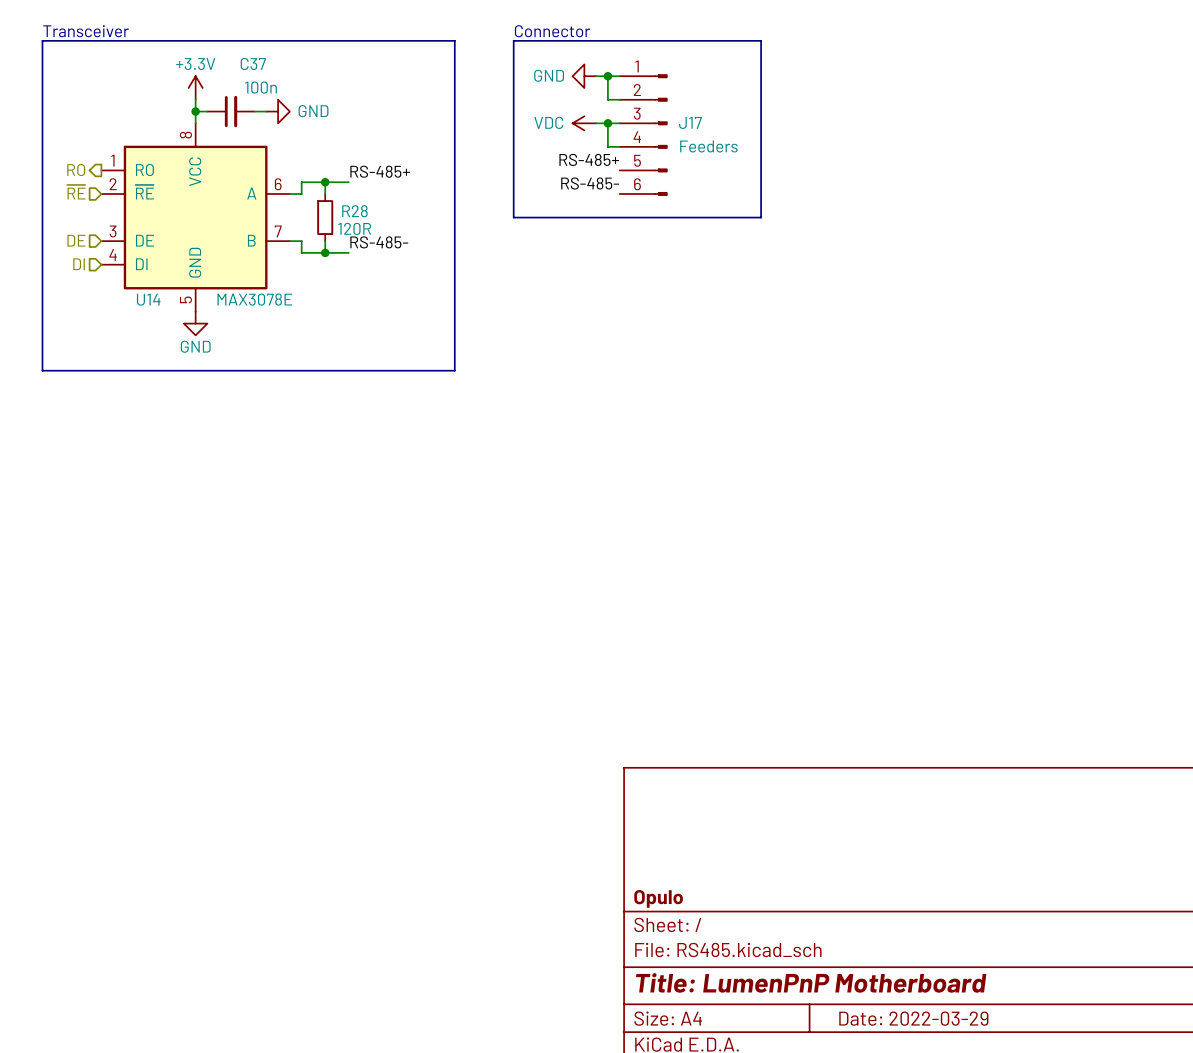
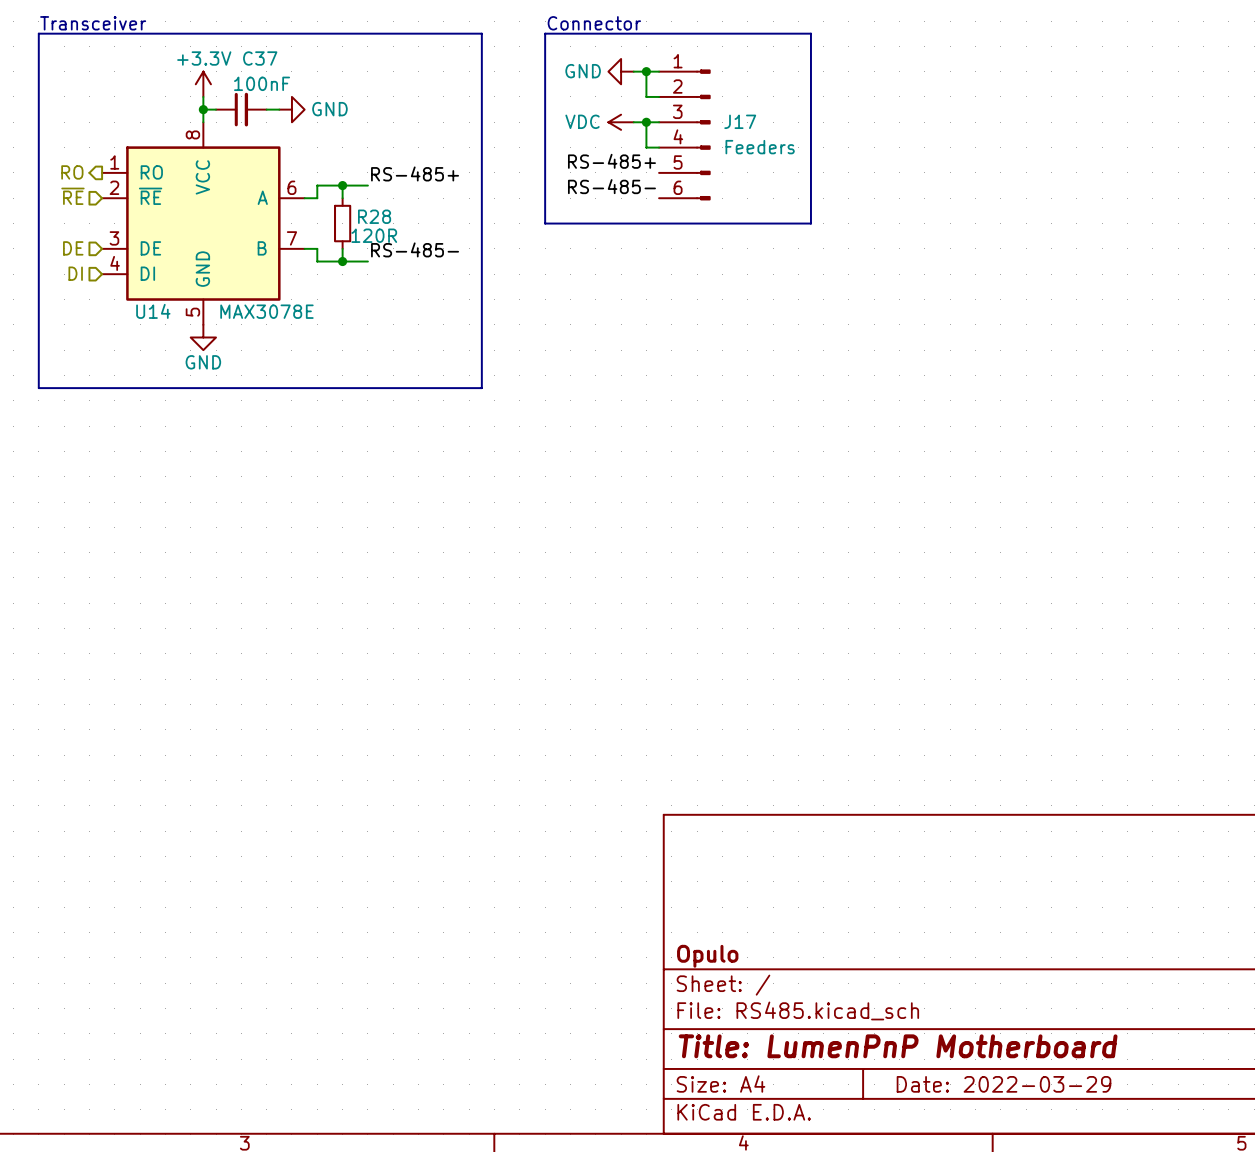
C37 value: 100n (260, 87) -> 100nF (262, 83)

